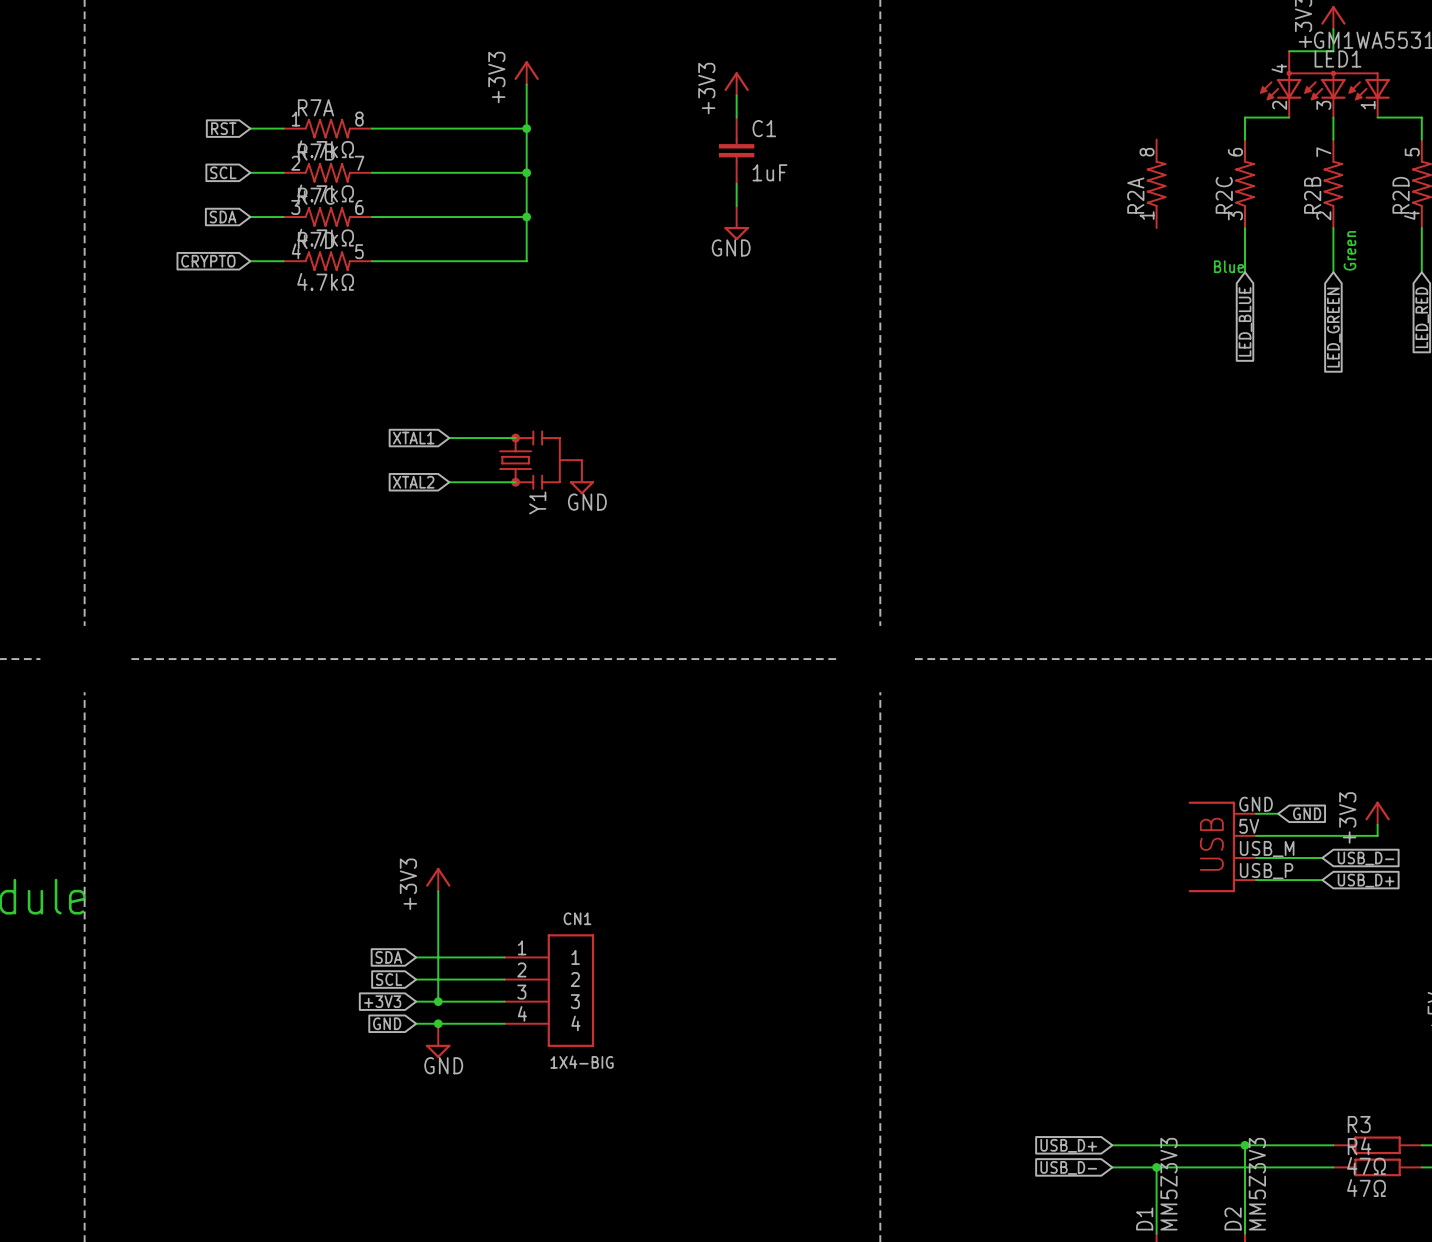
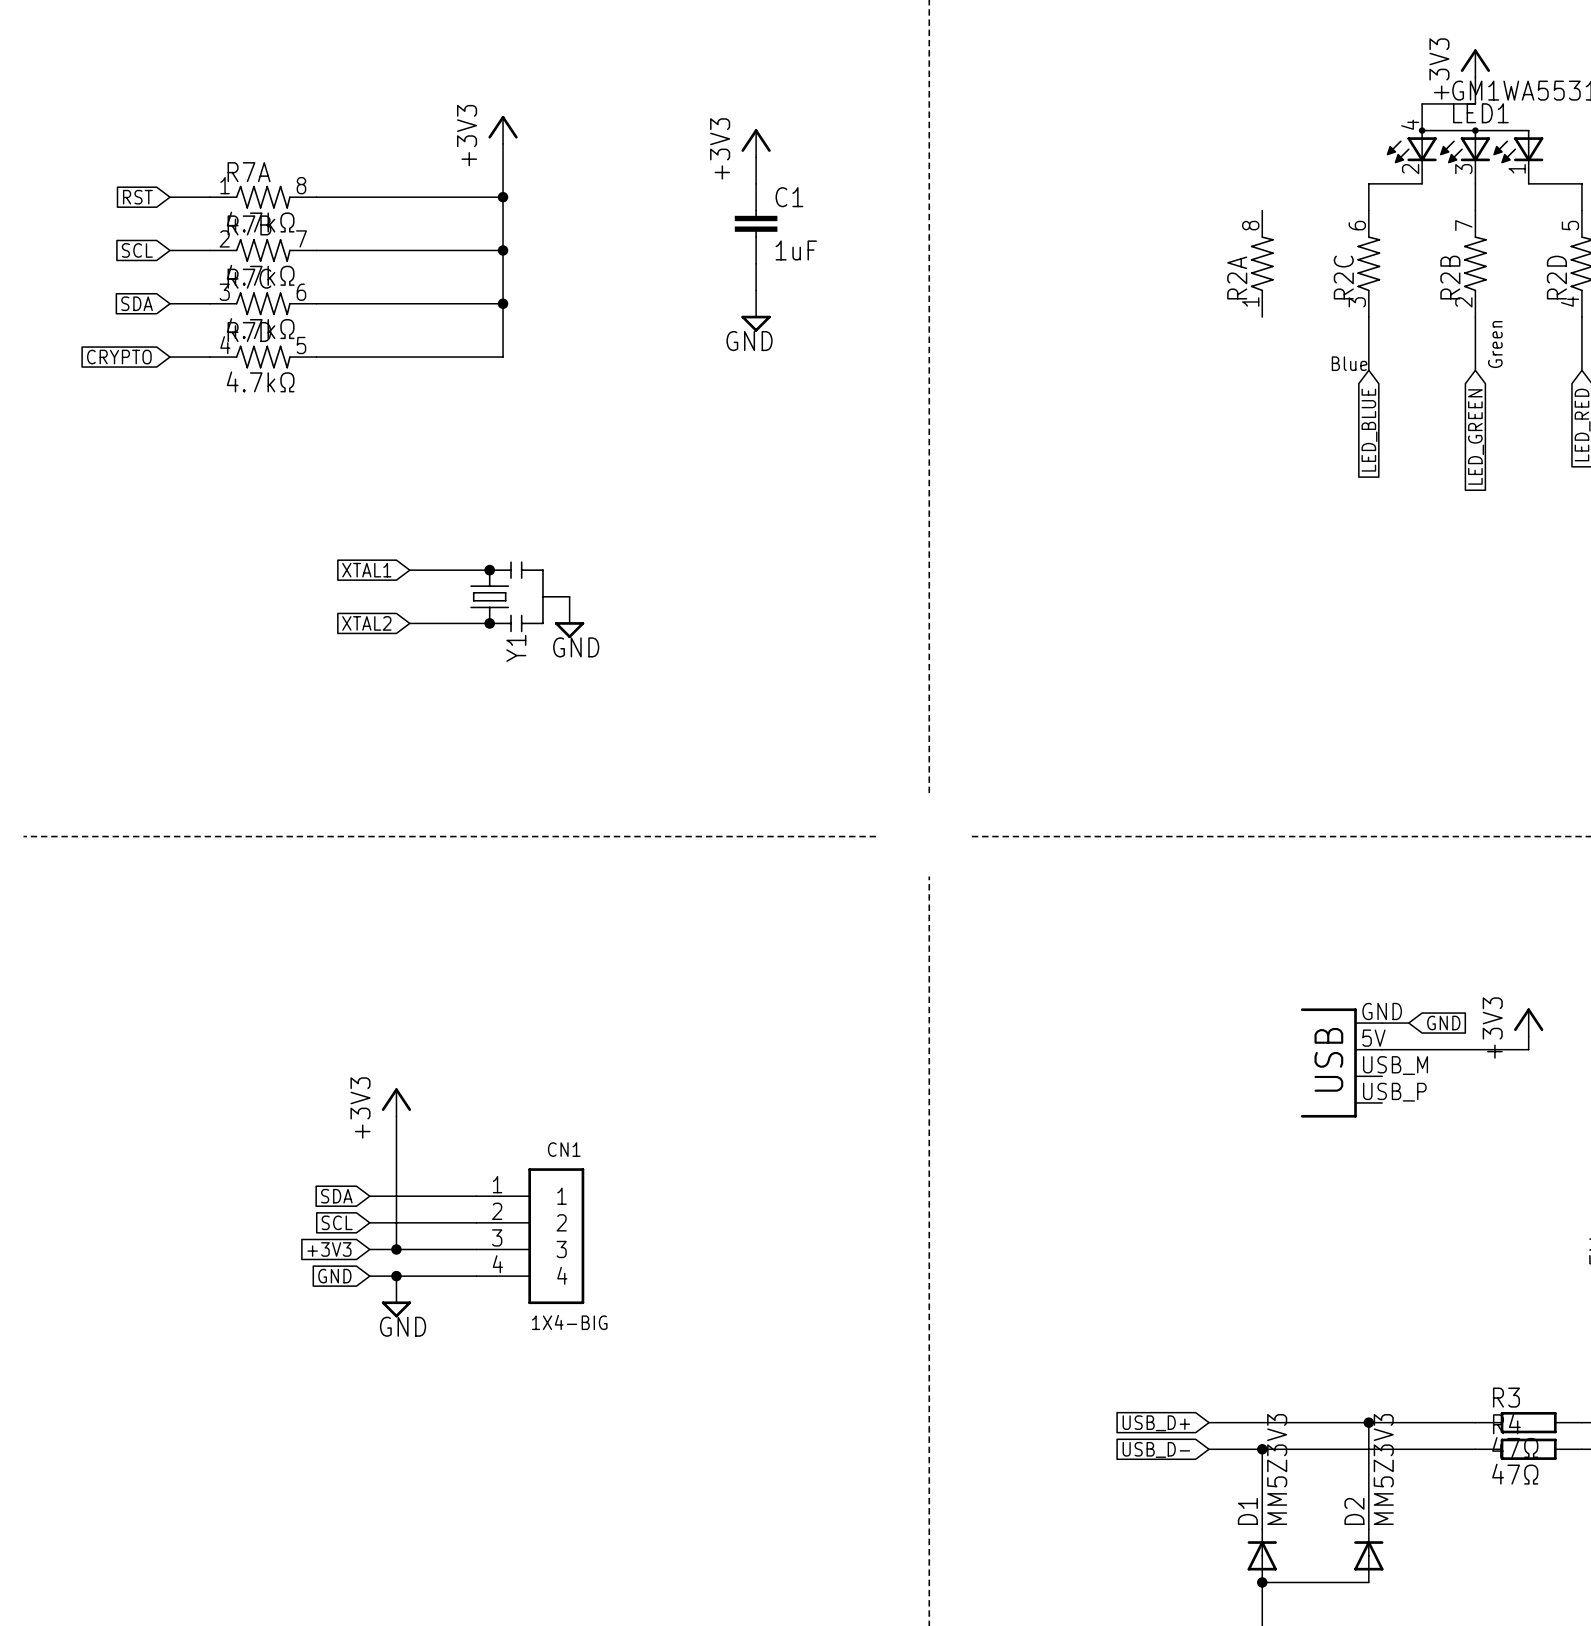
wire: (1256, 857) (1322, 857) -> none
global label: USB_D- (1366, 858) -> none
wire: (1256, 880) (1322, 880) -> none
global label: USB_D+ (1366, 880) -> none

